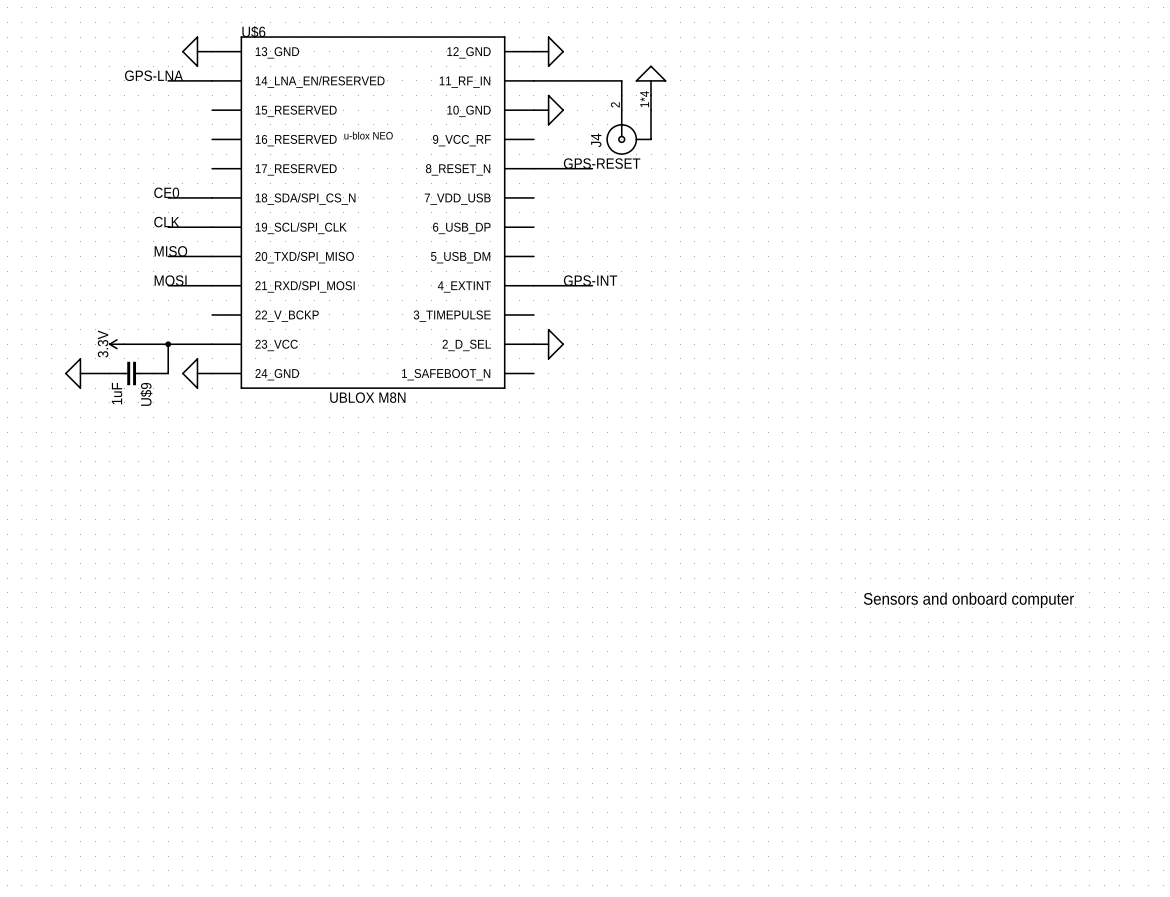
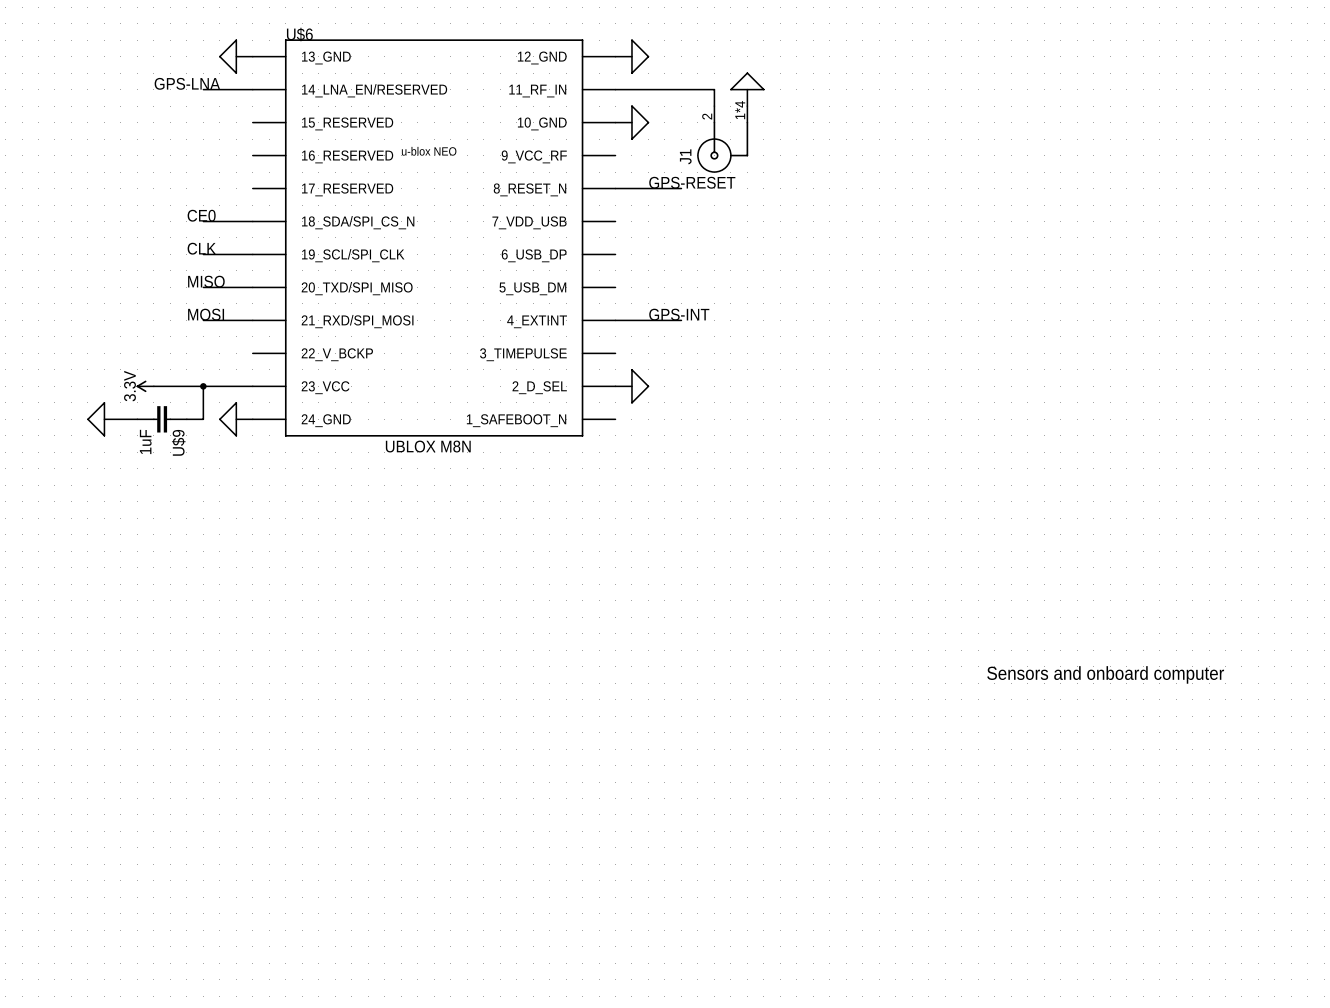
J4 name: J4 (596, 140) -> J1 (685, 156)

